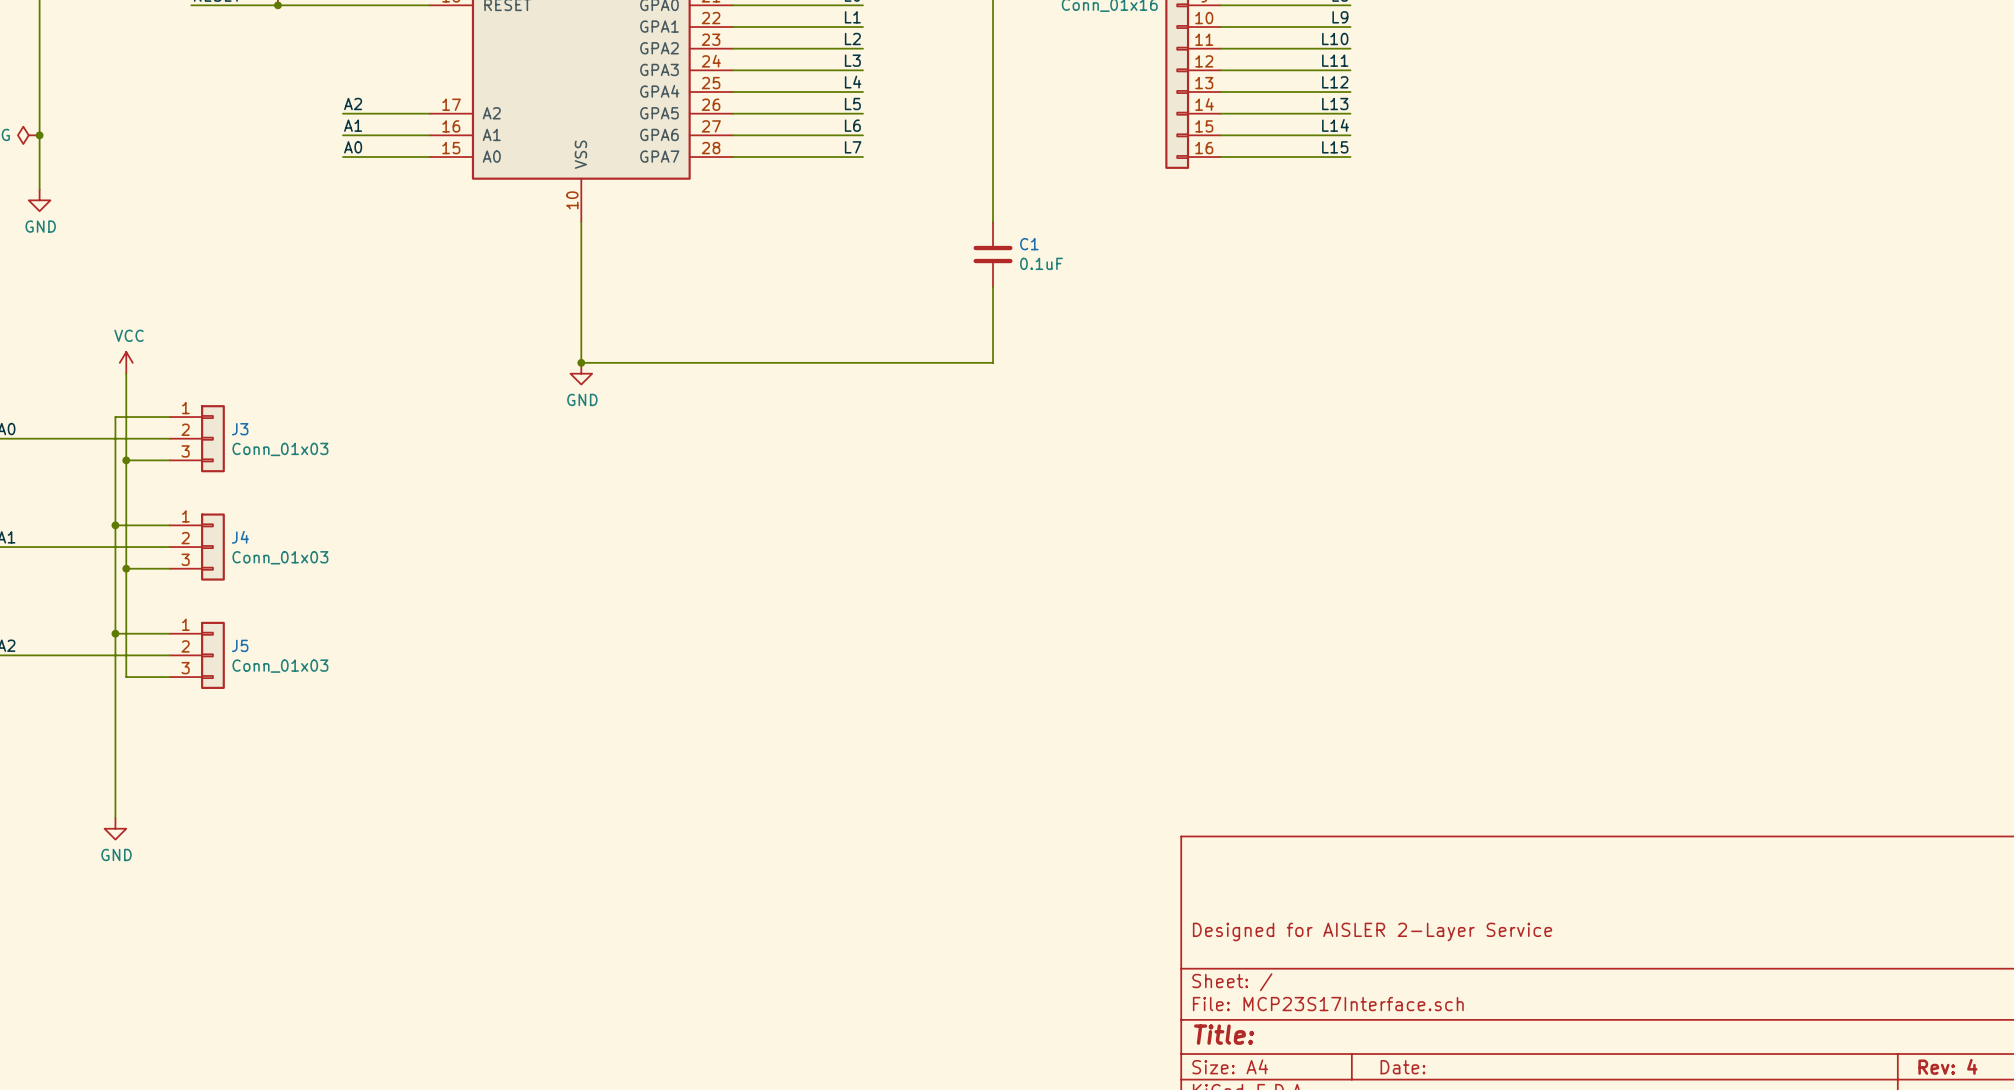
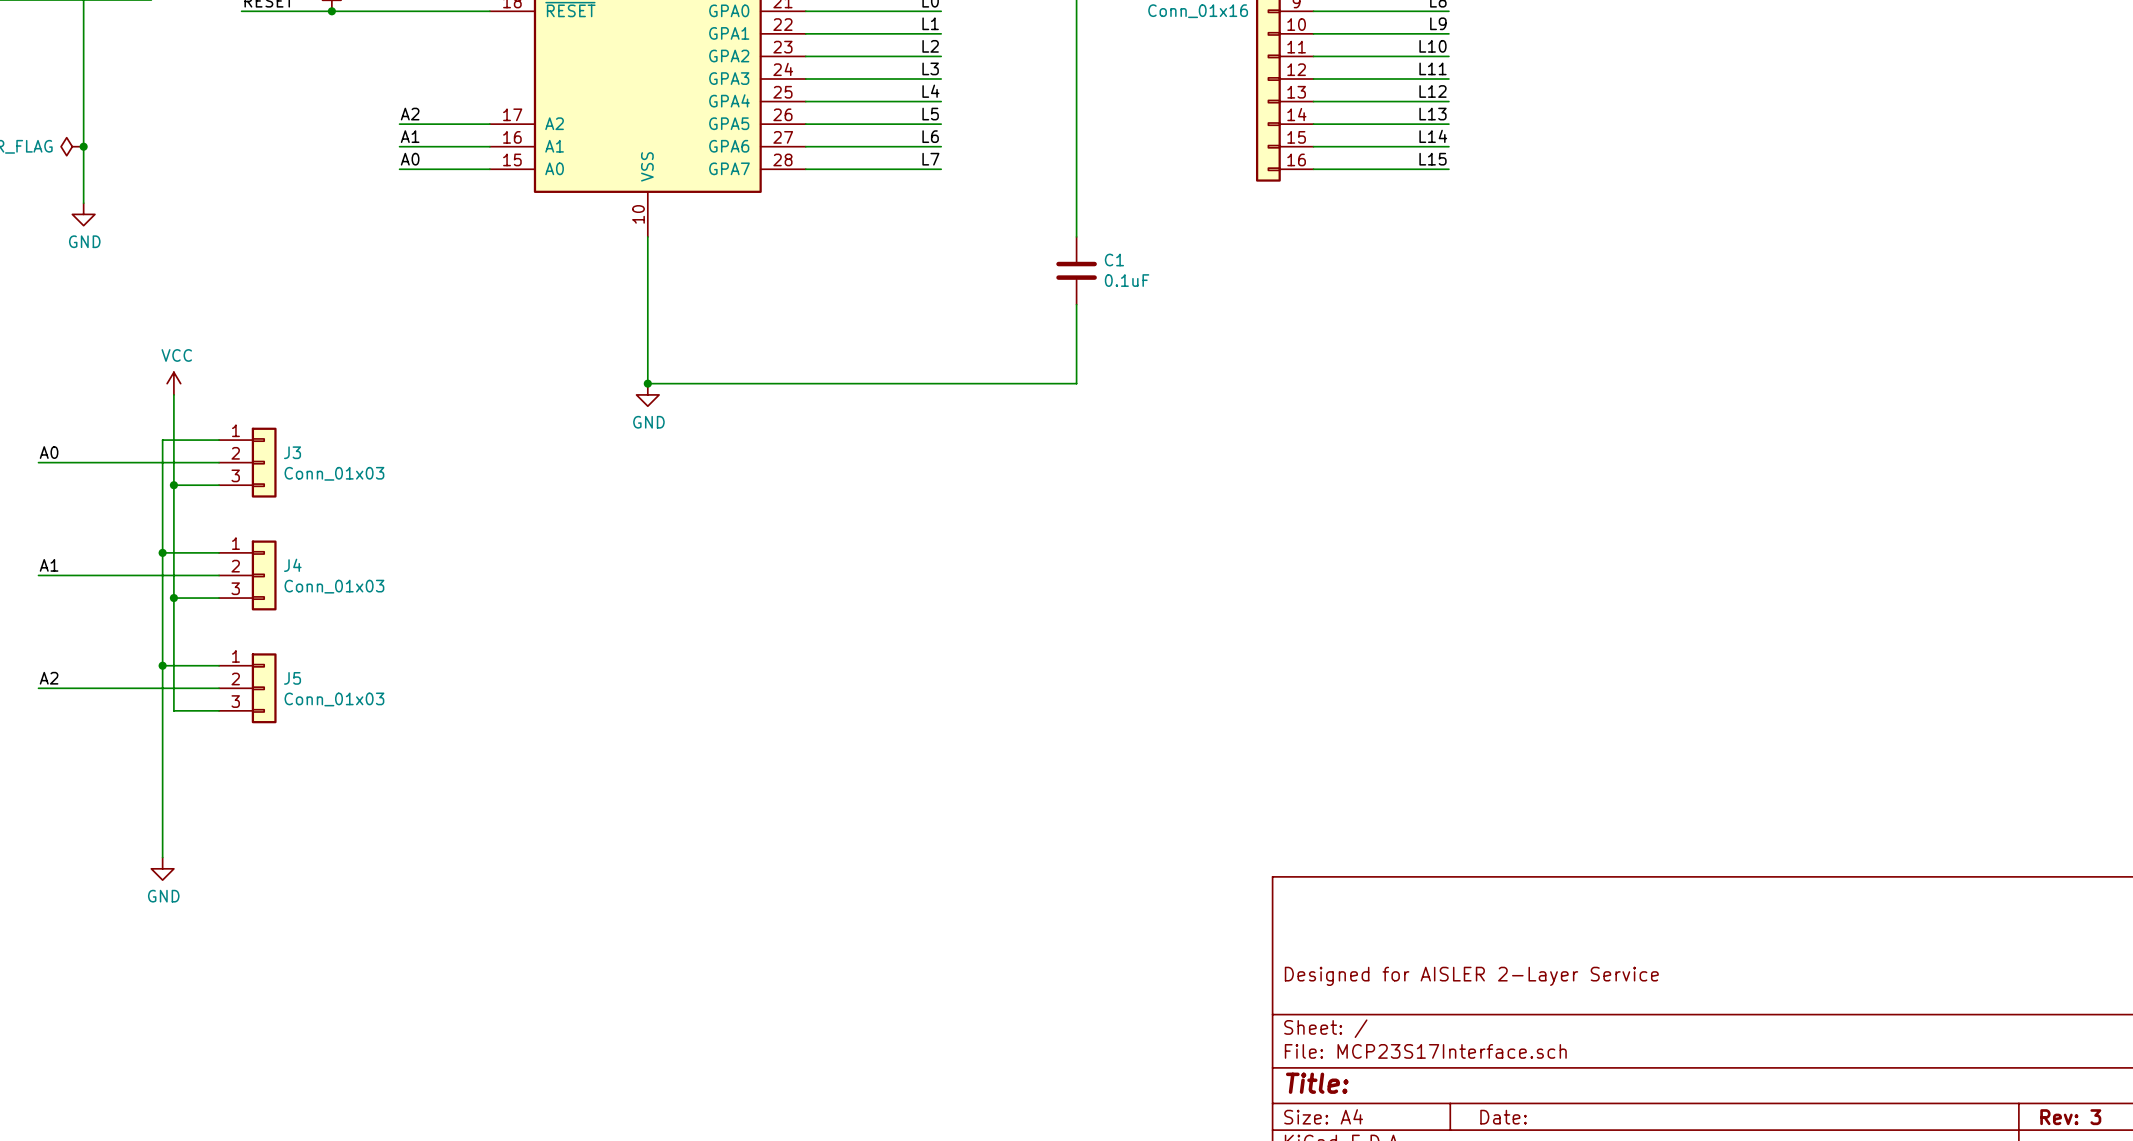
title block: Rev: 4 (1947, 1066) -> Rev: 3 (2070, 1117)

